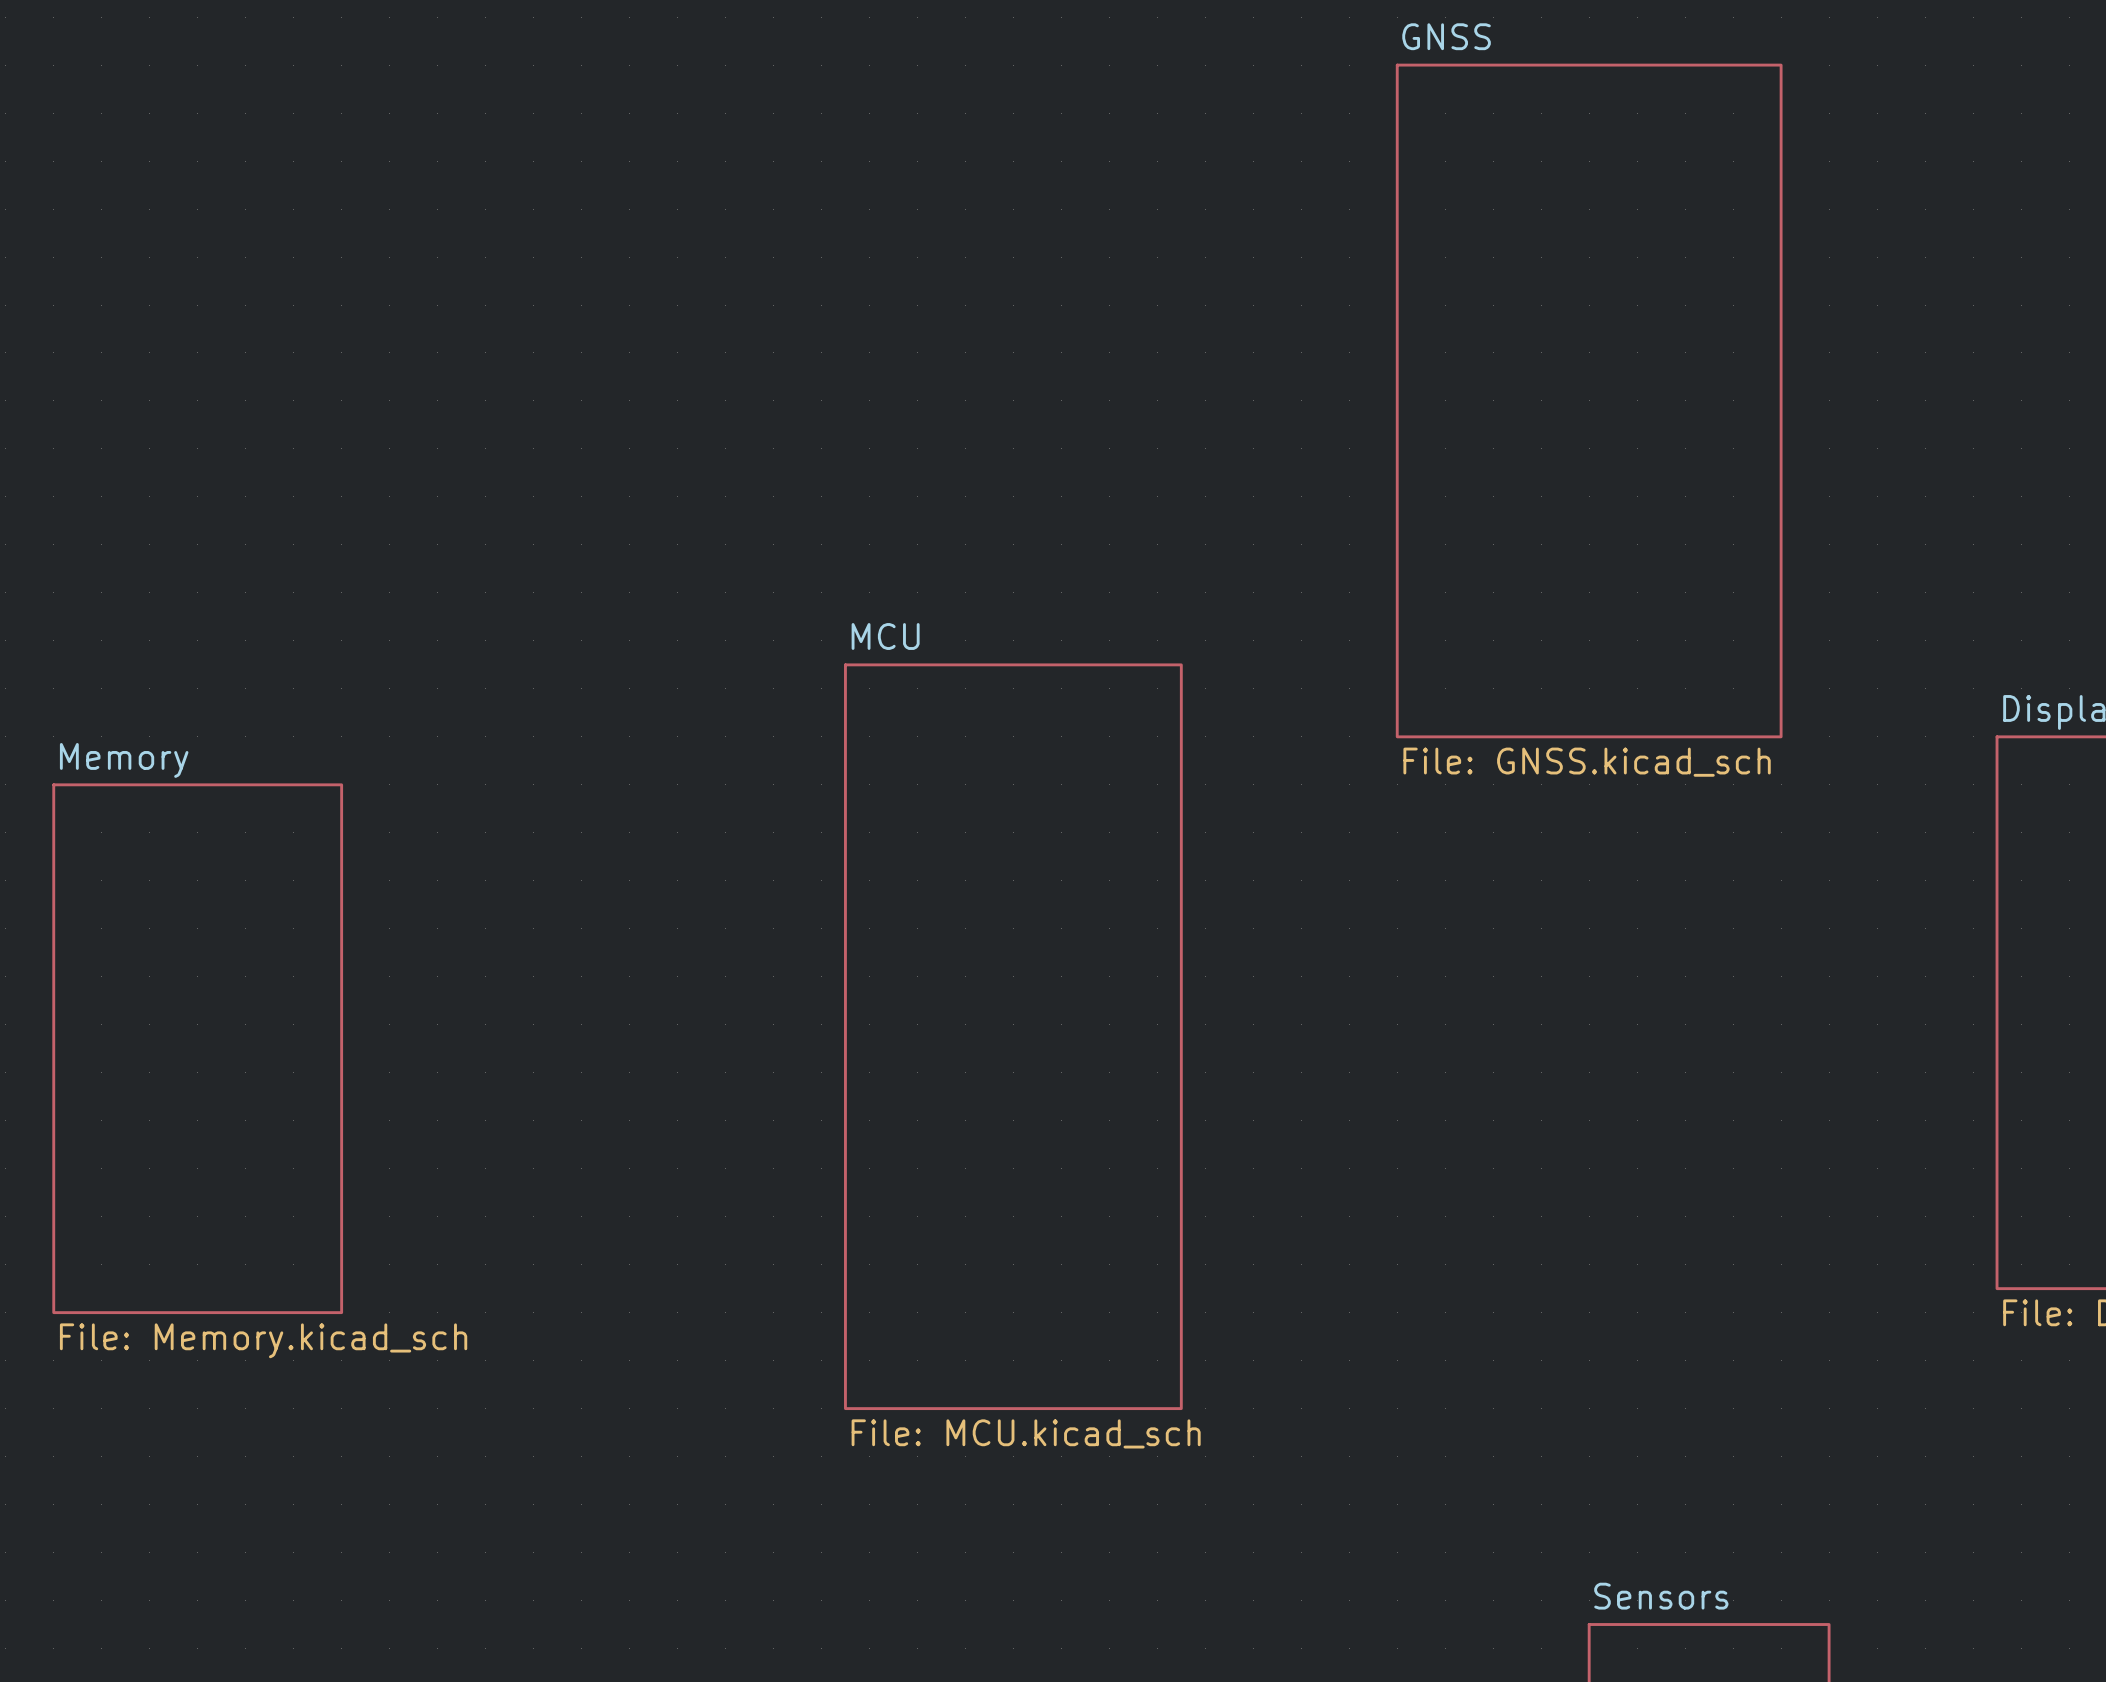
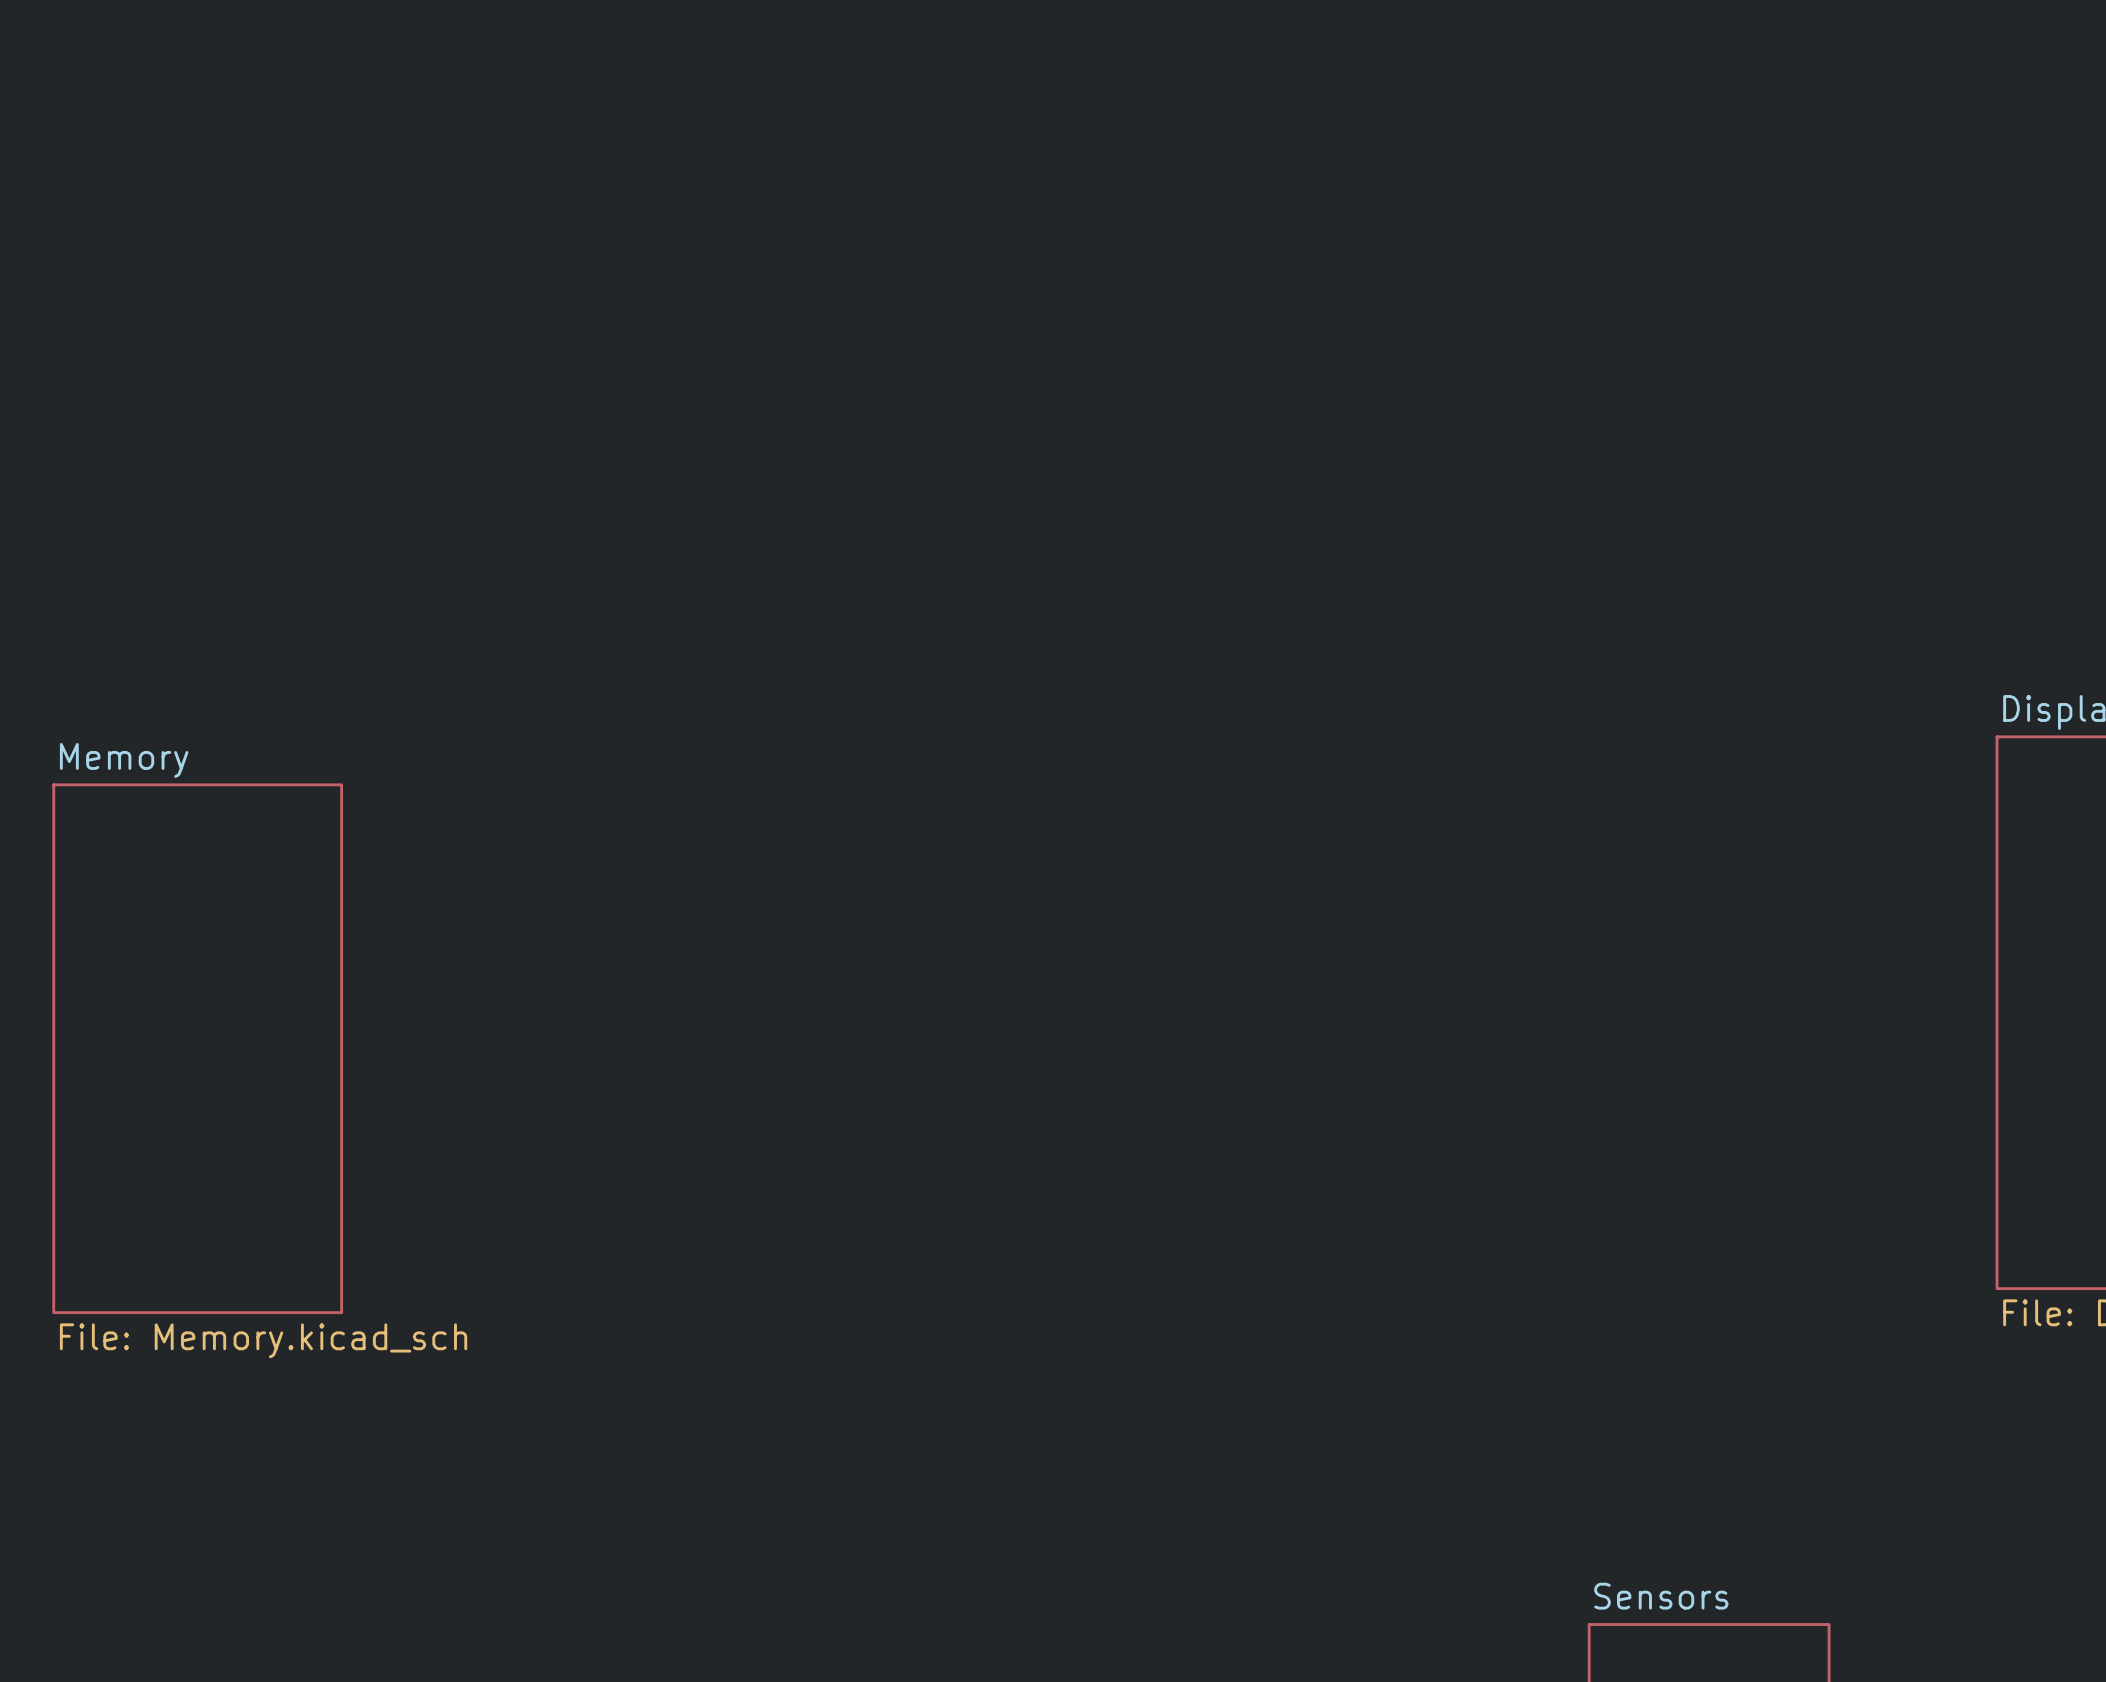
sheet GNSS: File: GNSS.kicad_sch (1589, 400) -> none
sheet MCU: File: MCU.kicad_sch (1013, 1036) -> none

